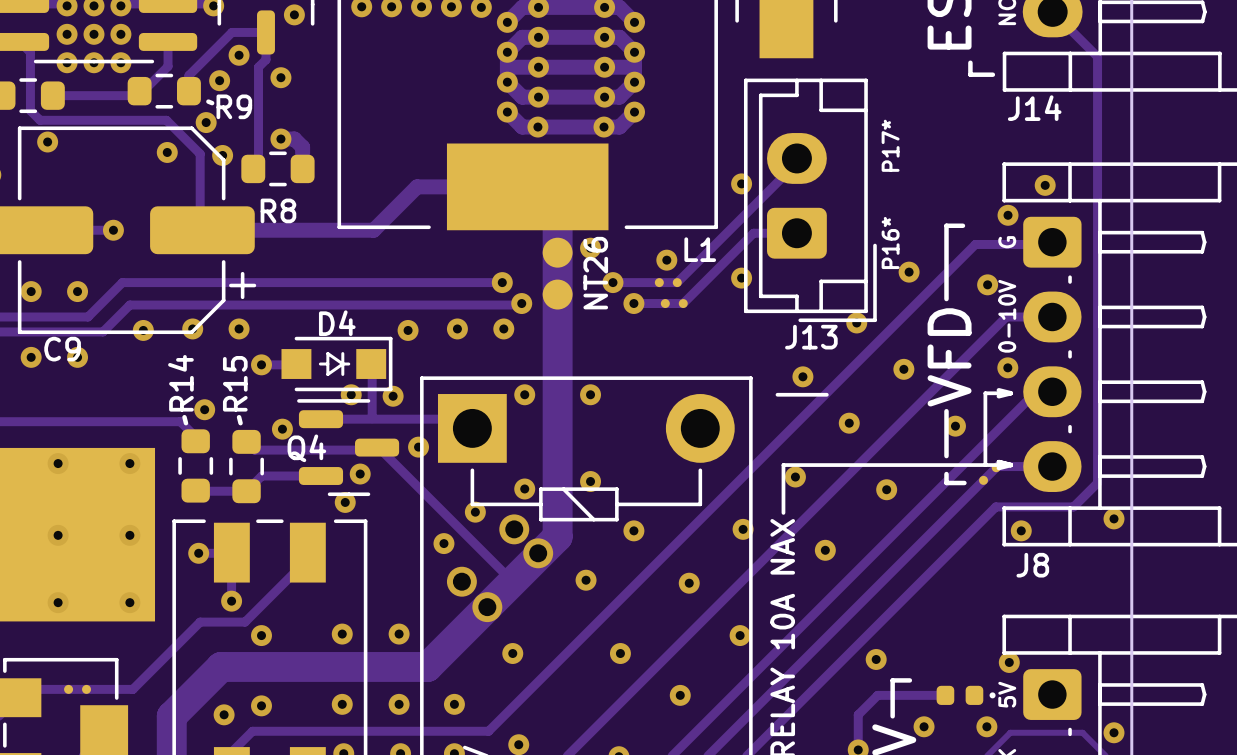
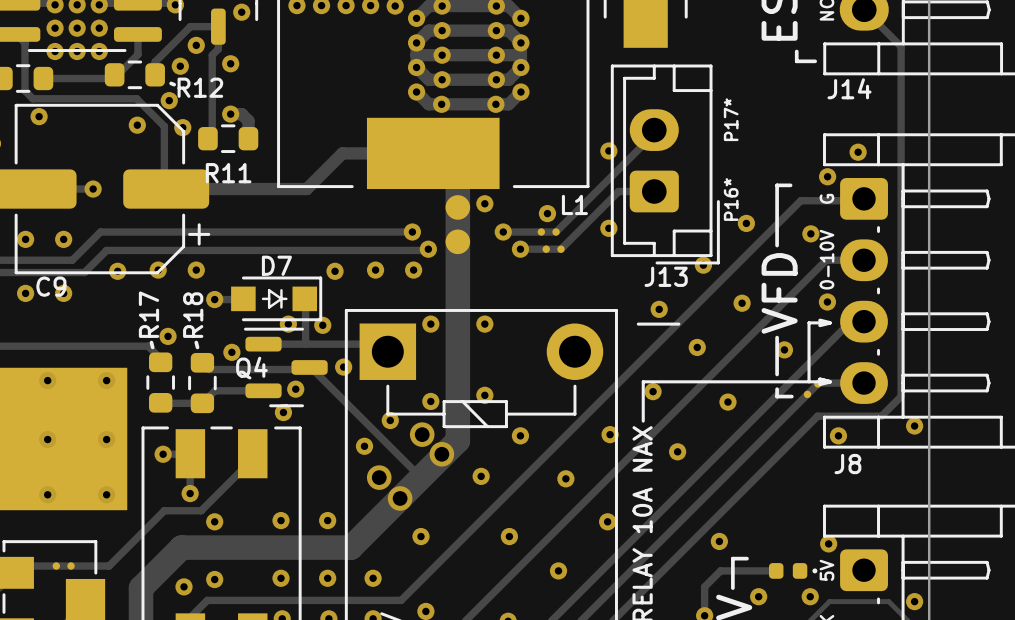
R9 name: R9 (234, 106) -> R12 (200, 87)
R8 name: R8 (278, 210) -> R11 (228, 173)
NT26 name: NT26 (595, 273) -> none
D4 name: D4 (337, 323) -> D7 (276, 265)
R14 name: R14 (180, 383) -> R17 (148, 314)
R15 name: R15 (235, 383) -> R18 (193, 315)

